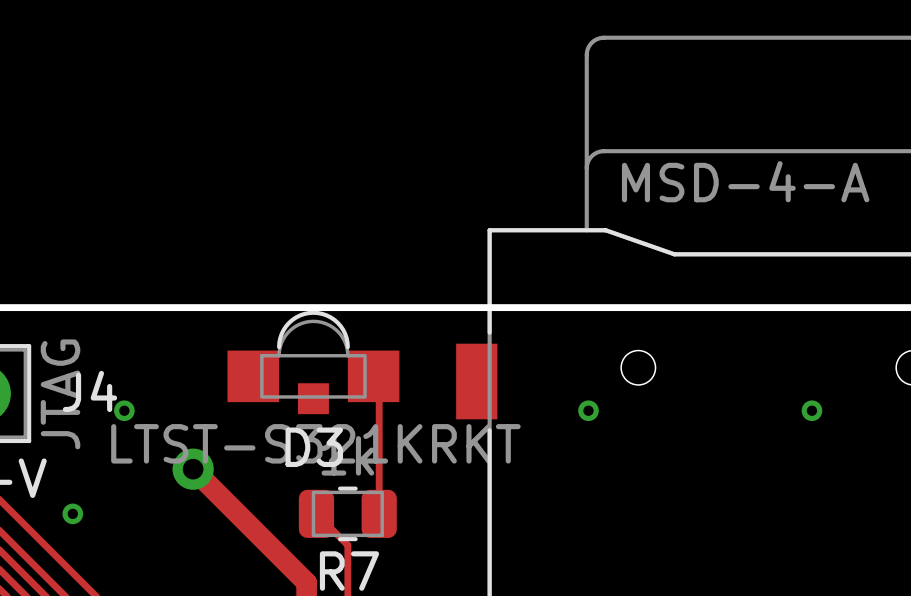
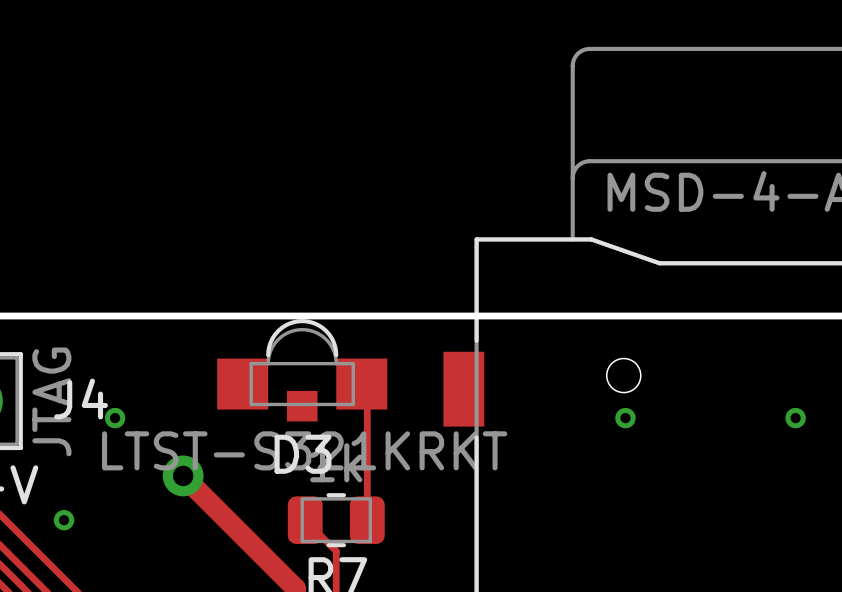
via position: (588, 410) -> (625, 418)

